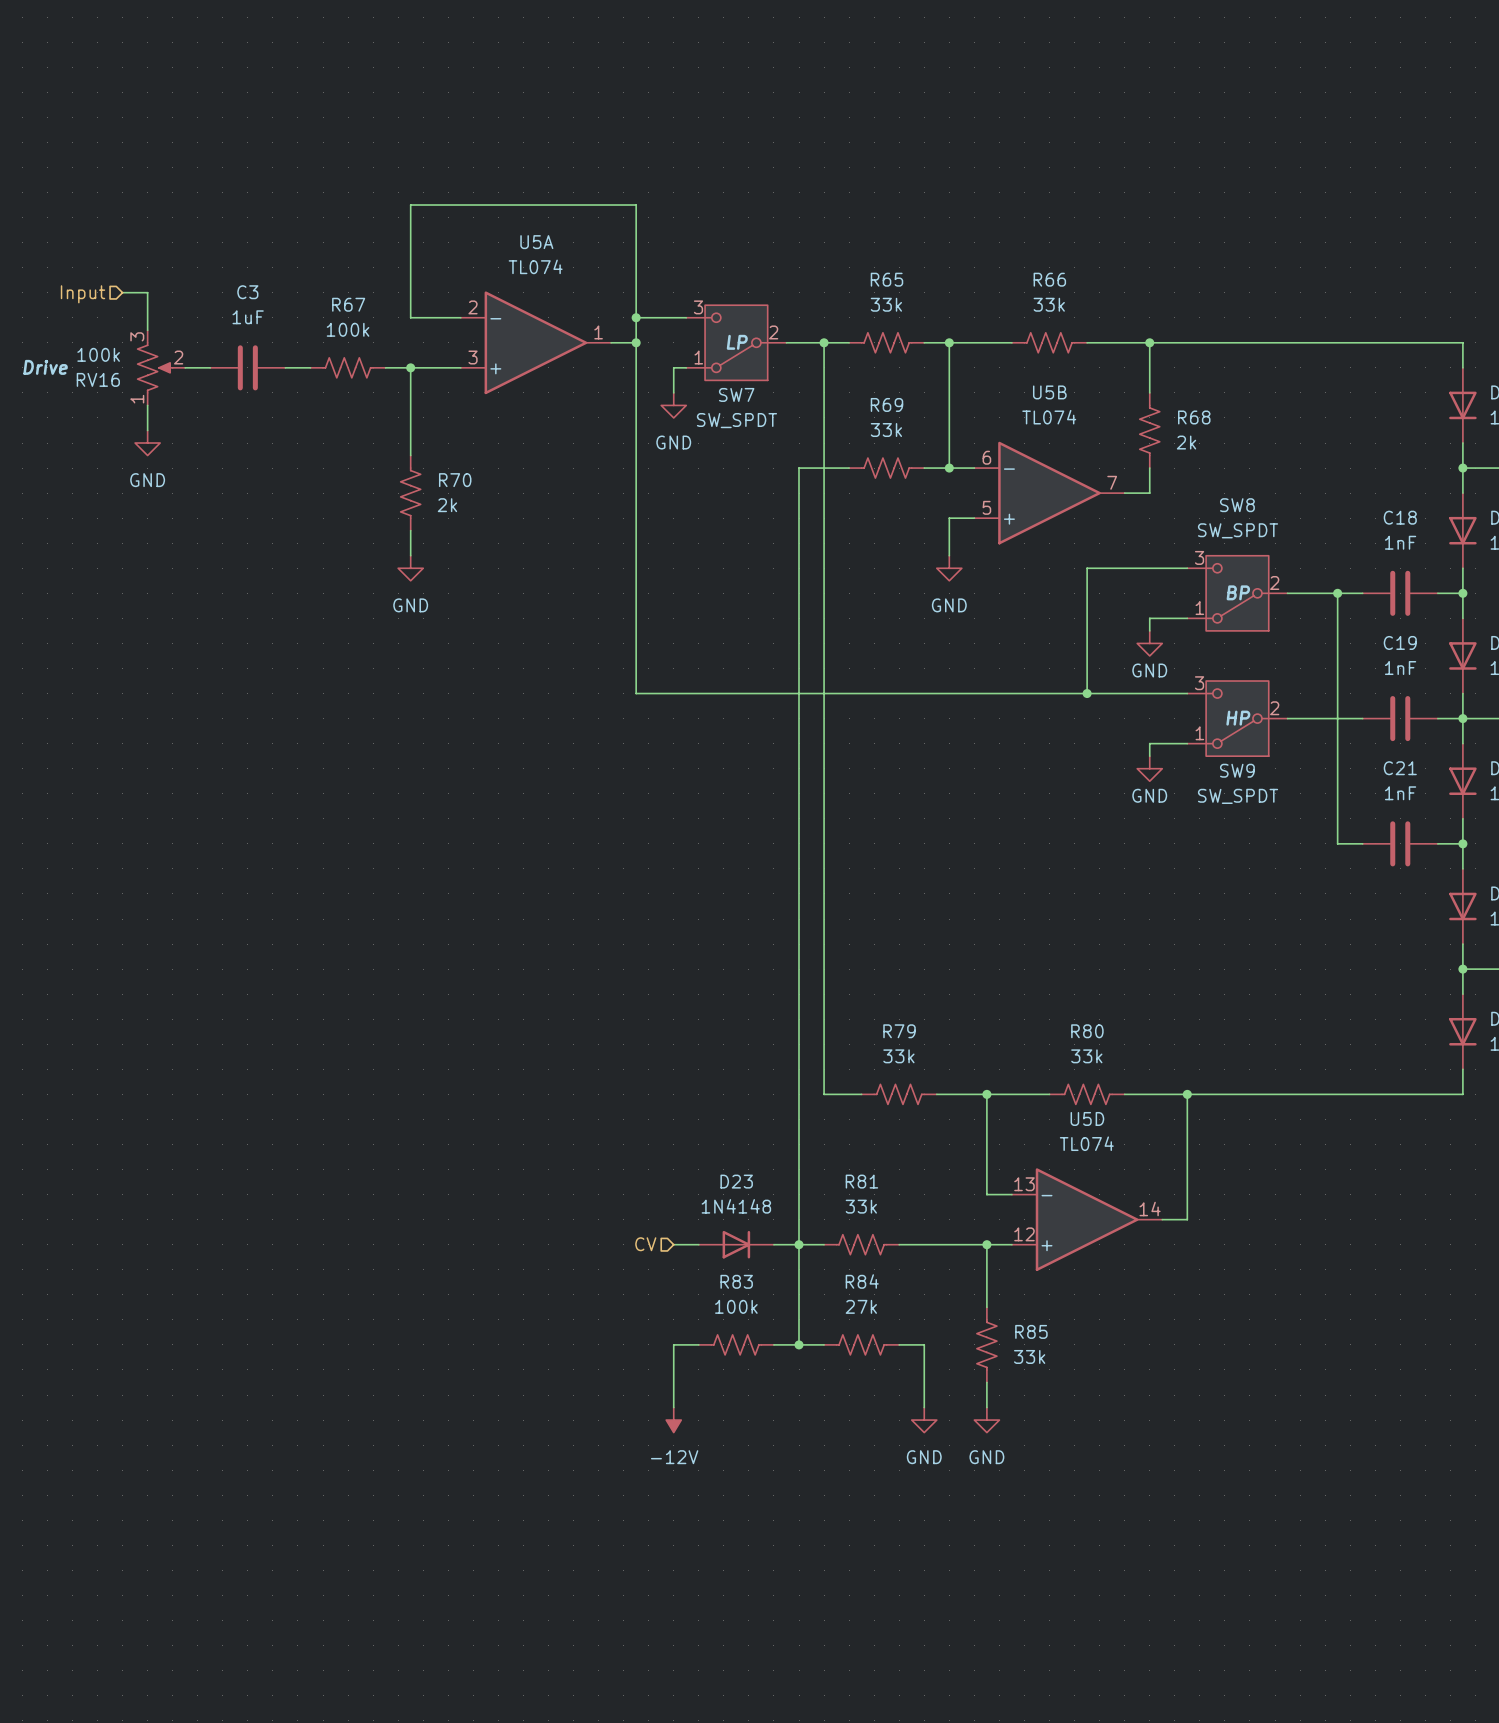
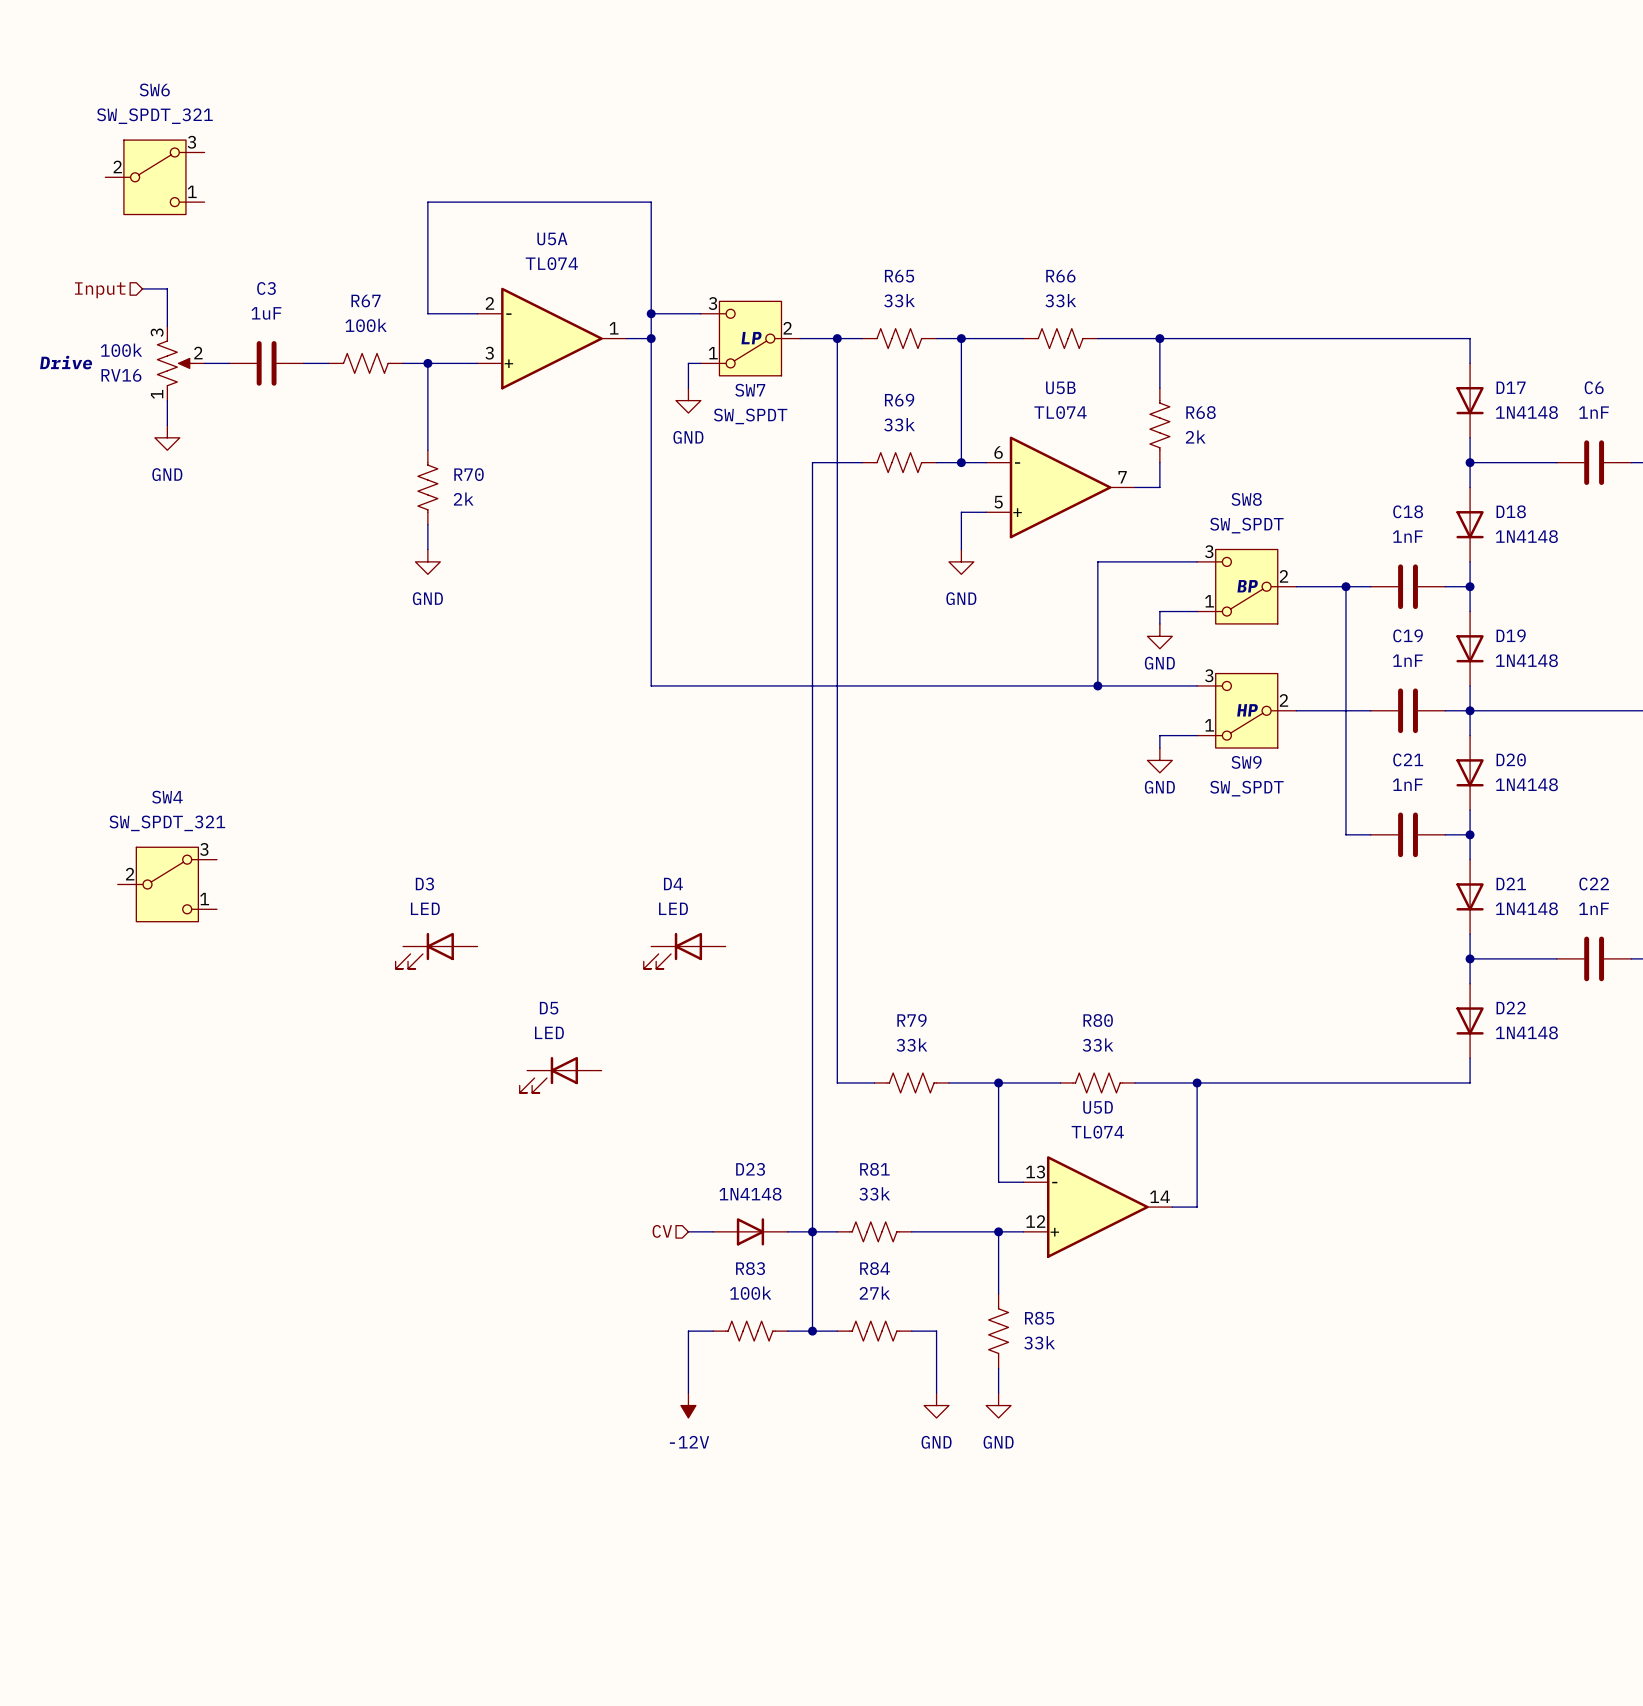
SW6: none -> SW_SPDT_321 (154, 177)
SW4: none -> SW_SPDT_321 (167, 884)
D3: none -> LED (436, 950)
D4: none -> LED (684, 950)
D5: none -> LED (560, 1074)

